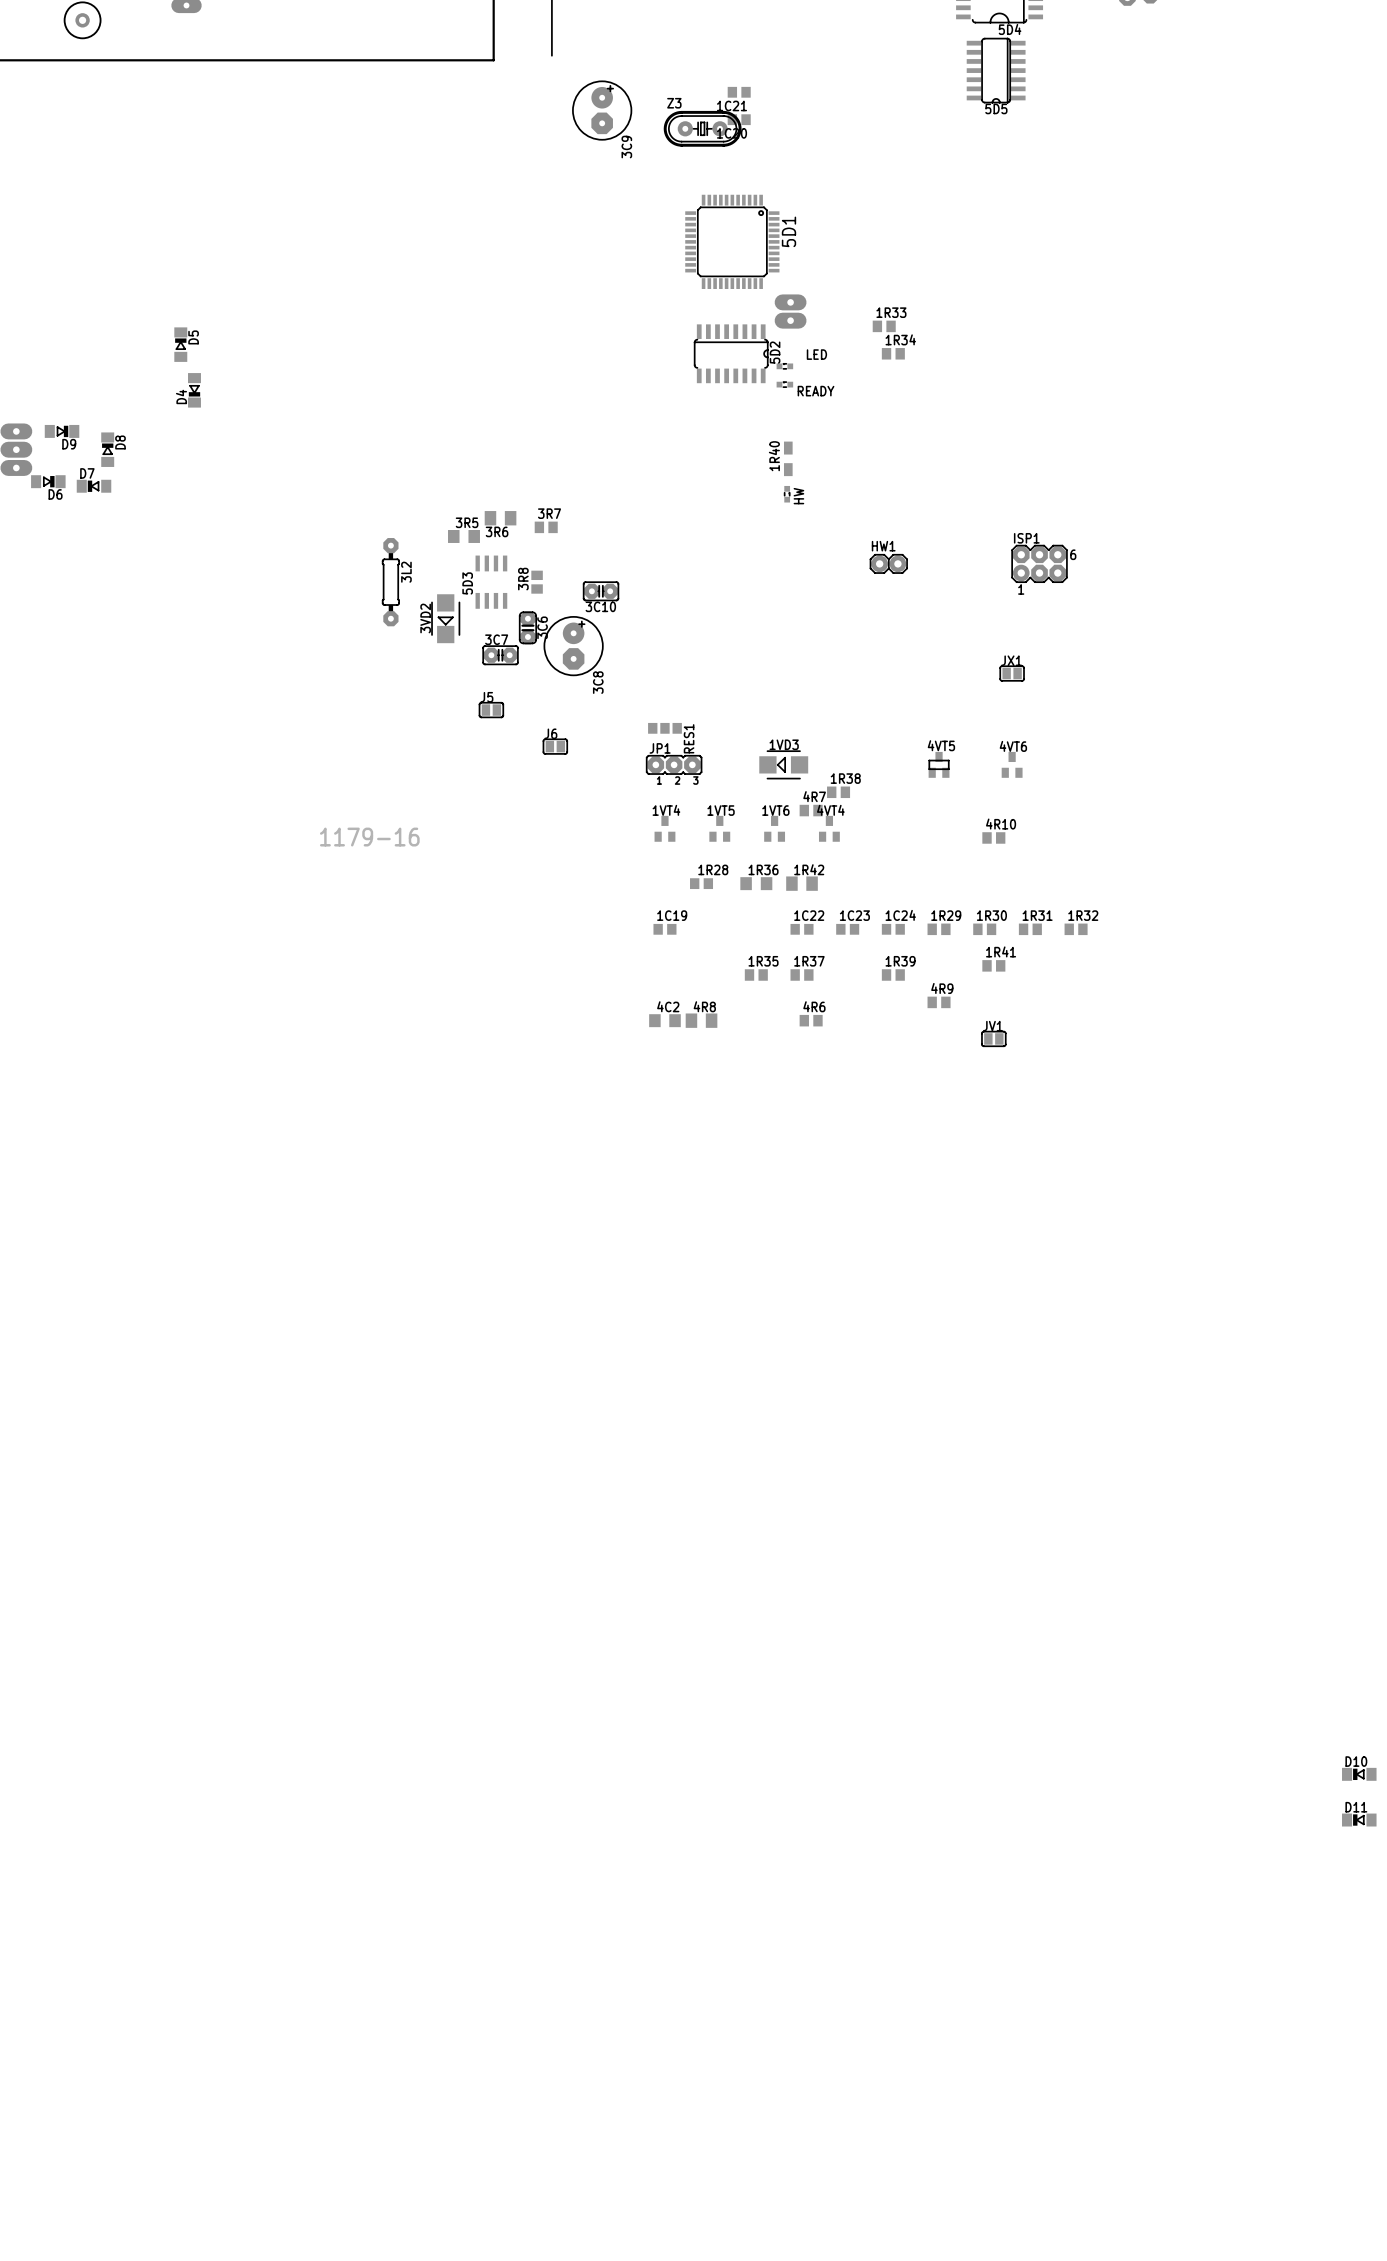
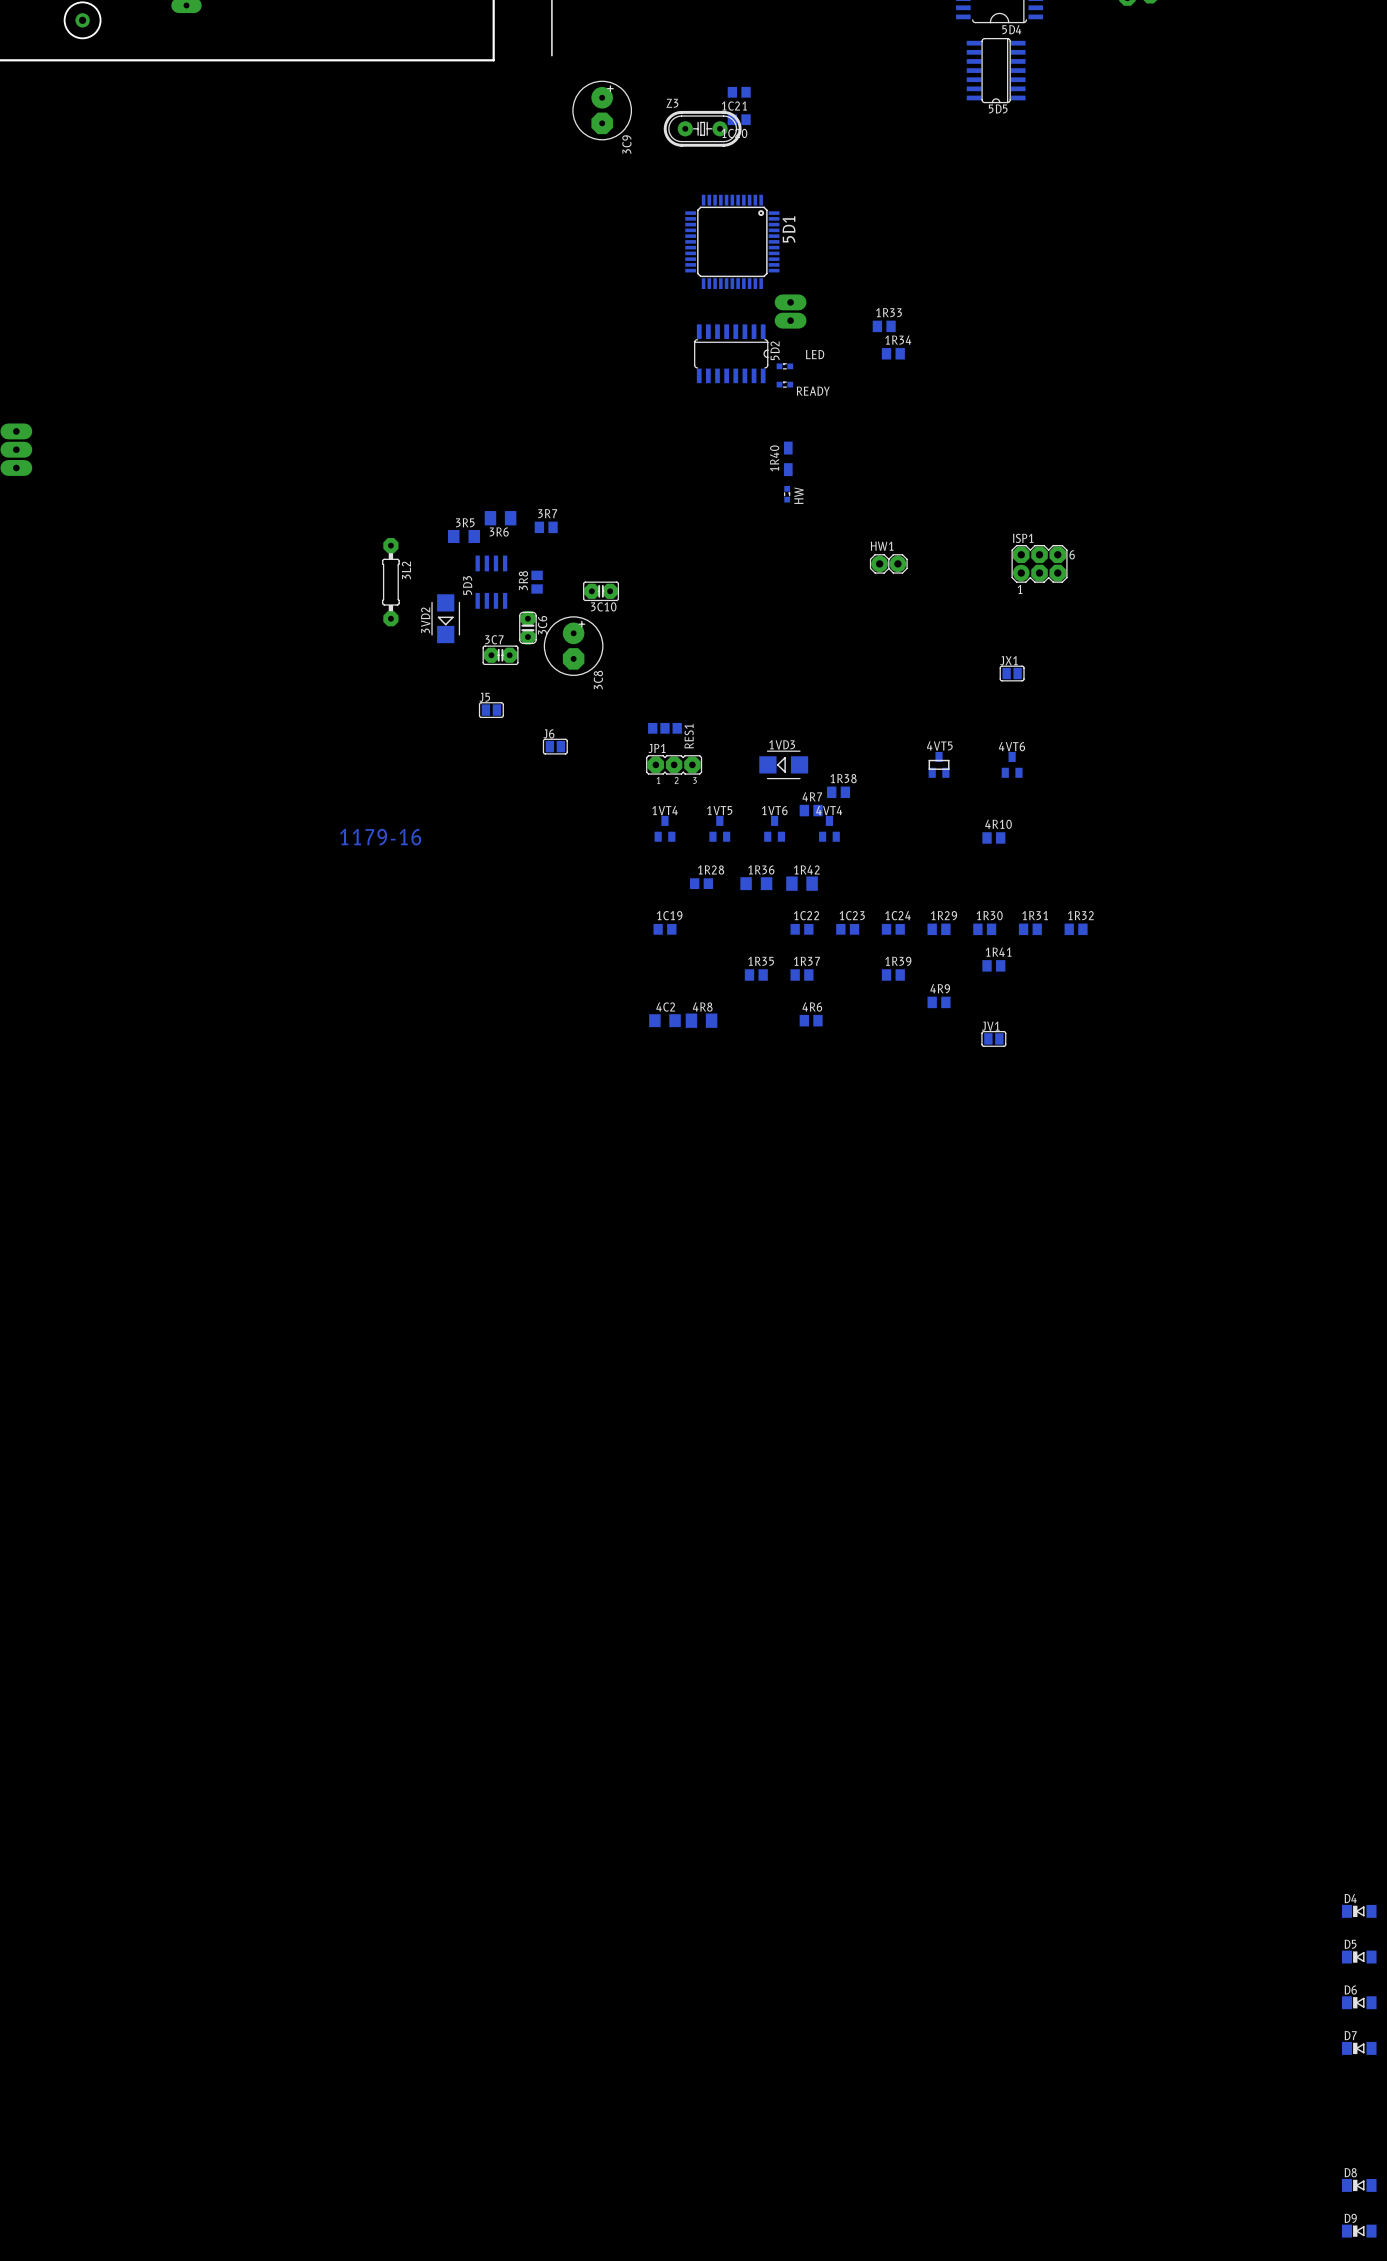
D5 rotation: 0° (180, 344) -> 90° counterclockwise (1359, 1957)
D5 position: (180, 344) -> (1359, 1957)
D4 rotation: 0° (194, 390) -> 90° clockwise (1359, 1911)
D4 position: (194, 390) -> (1359, 1911)
D9 rotation: 0° (62, 431) -> 180° (1359, 2231)
D9 position: (62, 431) -> (1359, 2231)
D8 rotation: 0° (107, 449) -> 90° counterclockwise (1359, 2185)
D8 position: (107, 449) -> (1359, 2185)
D6 rotation: 0° (48, 481) -> 180° (1359, 2002)
D6 position: (48, 481) -> (1359, 2002)
D7 position: (94, 486) -> (1359, 2048)
D10: (1359, 1774) -> none
D11: (1359, 1820) -> none

